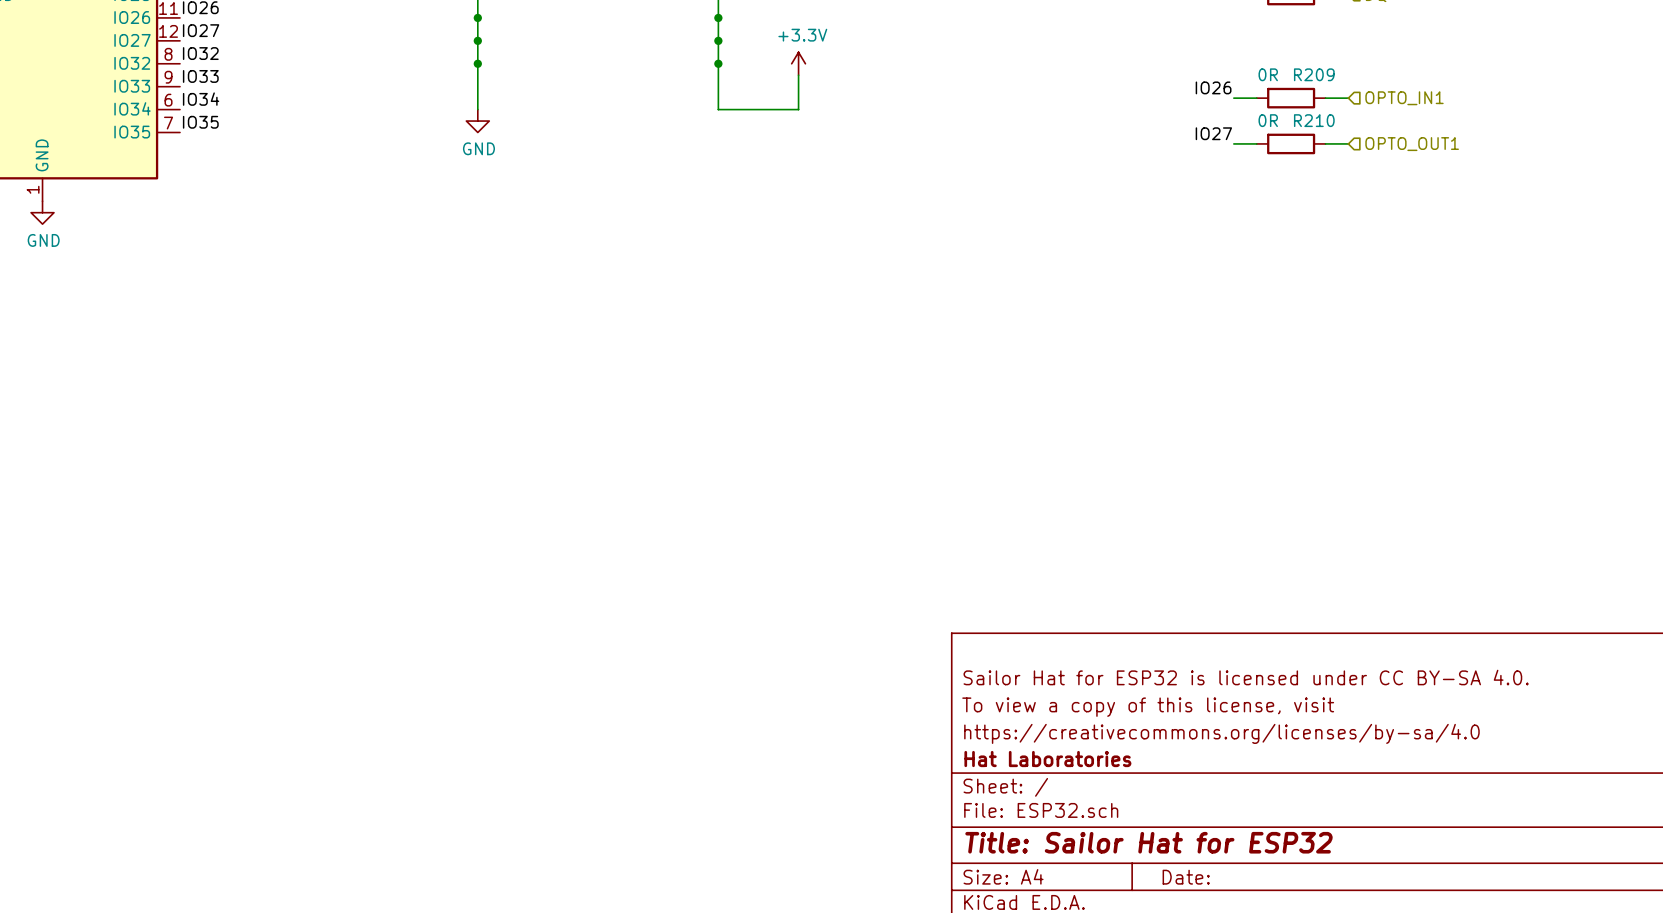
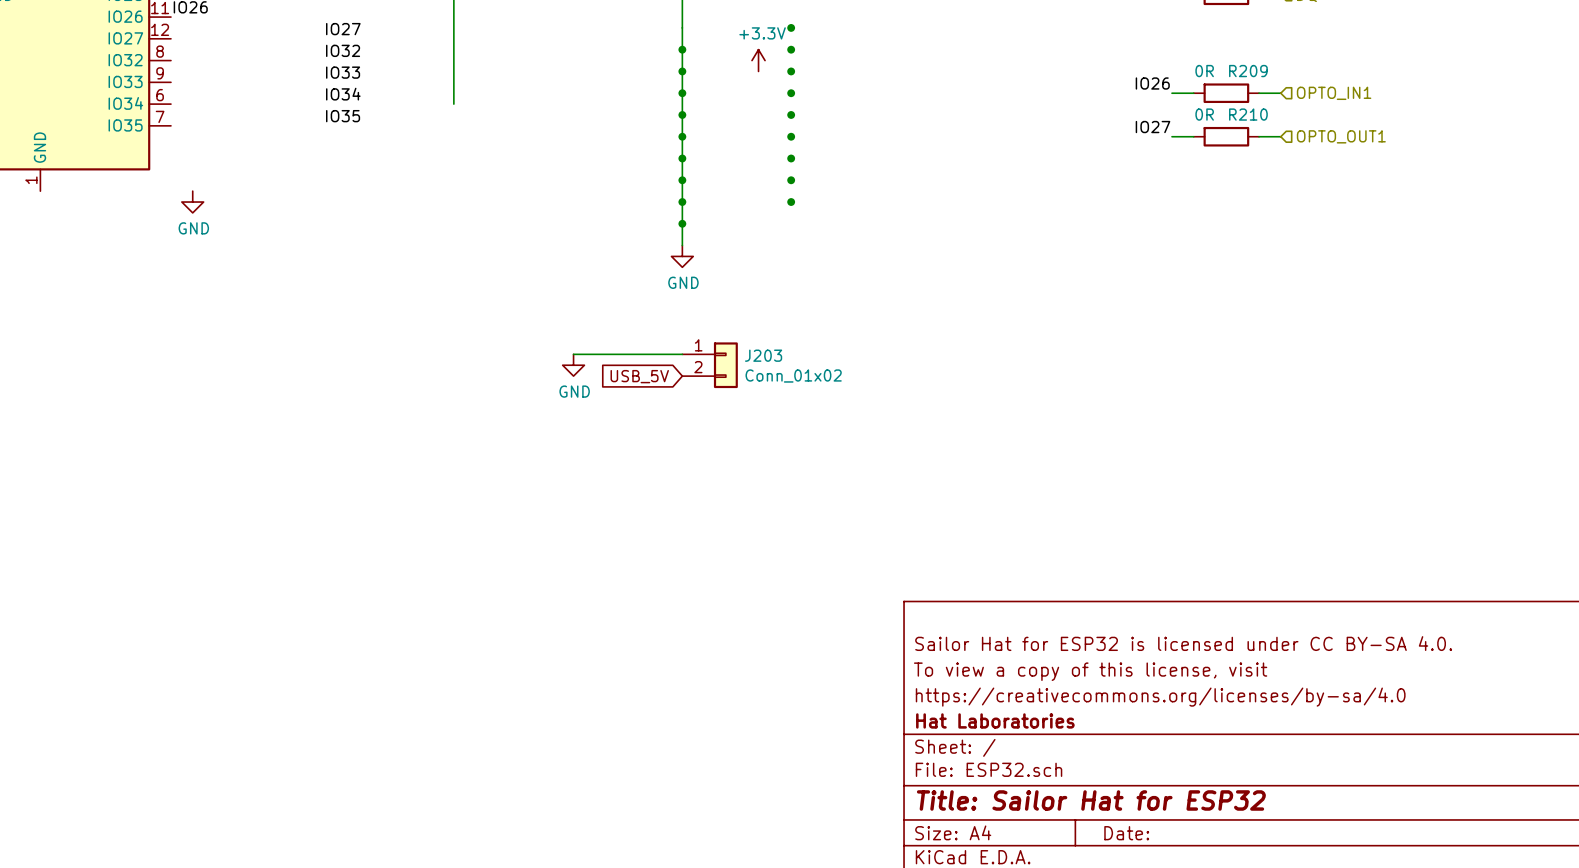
junction: (477, 17) -> none
junction: (718, 17) -> none
junction: none -> (791, 27)
label: IO27 (201, 30) -> none
label: none -> IO27 (343, 29)
junction: (477, 40) -> none
junction: (718, 40) -> none
junction: none -> (682, 49)
junction: none -> (791, 49)
label position: IO32 (200, 53) -> IO32 (343, 50)
junction: (477, 63) -> none
junction: (718, 63) -> none
junction: none -> (682, 71)
wire: (798, 75) (798, 109) (718, 109) -> (682, 245) (682, 104)
junction: none -> (791, 71)
label position: IO33 (200, 76) -> IO33 (343, 72)
junction: none -> (682, 93)
junction: none -> (791, 93)
label position: IO34 (201, 99) -> IO34 (343, 94)
power symbol: GND (477, 121) -> none
junction: none -> (682, 114)
junction: none -> (791, 114)
label position: IO35 (200, 122) -> IO35 (343, 116)
junction: none -> (682, 136)
junction: none -> (791, 136)
junction: none -> (682, 158)
junction: none -> (791, 158)
junction: none -> (682, 180)
junction: none -> (791, 180)
power symbol: GND (42, 212) -> none
power symbol: none -> GND (192, 202)
junction: none -> (682, 202)
junction: none -> (791, 202)
junction: none -> (682, 223)
power symbol: none -> GND (682, 256)
wire: none -> (573, 354) (682, 354)
power symbol: none -> GND (573, 365)
J203: none -> Conn_01x02 (710, 365)
global label: none -> USB_5V (639, 376)

